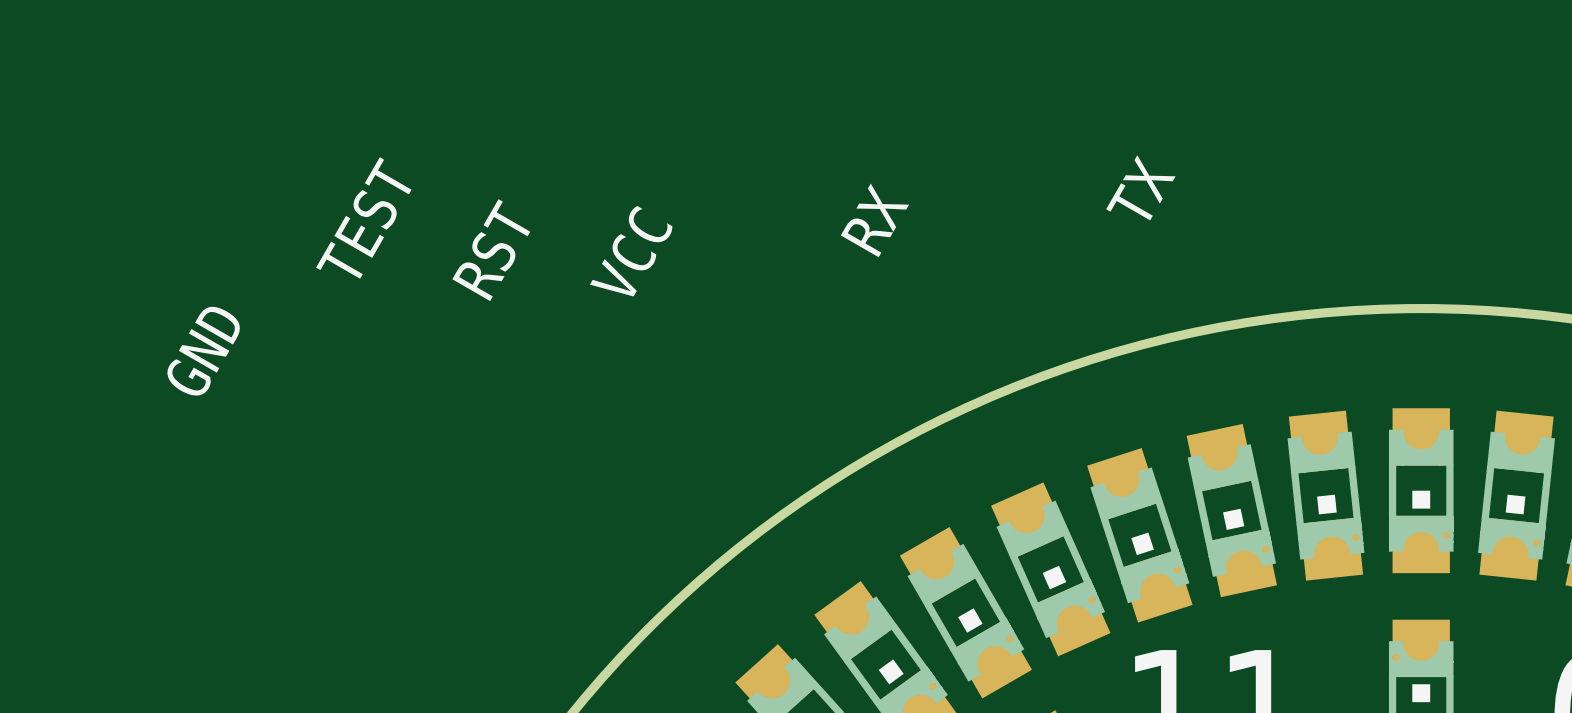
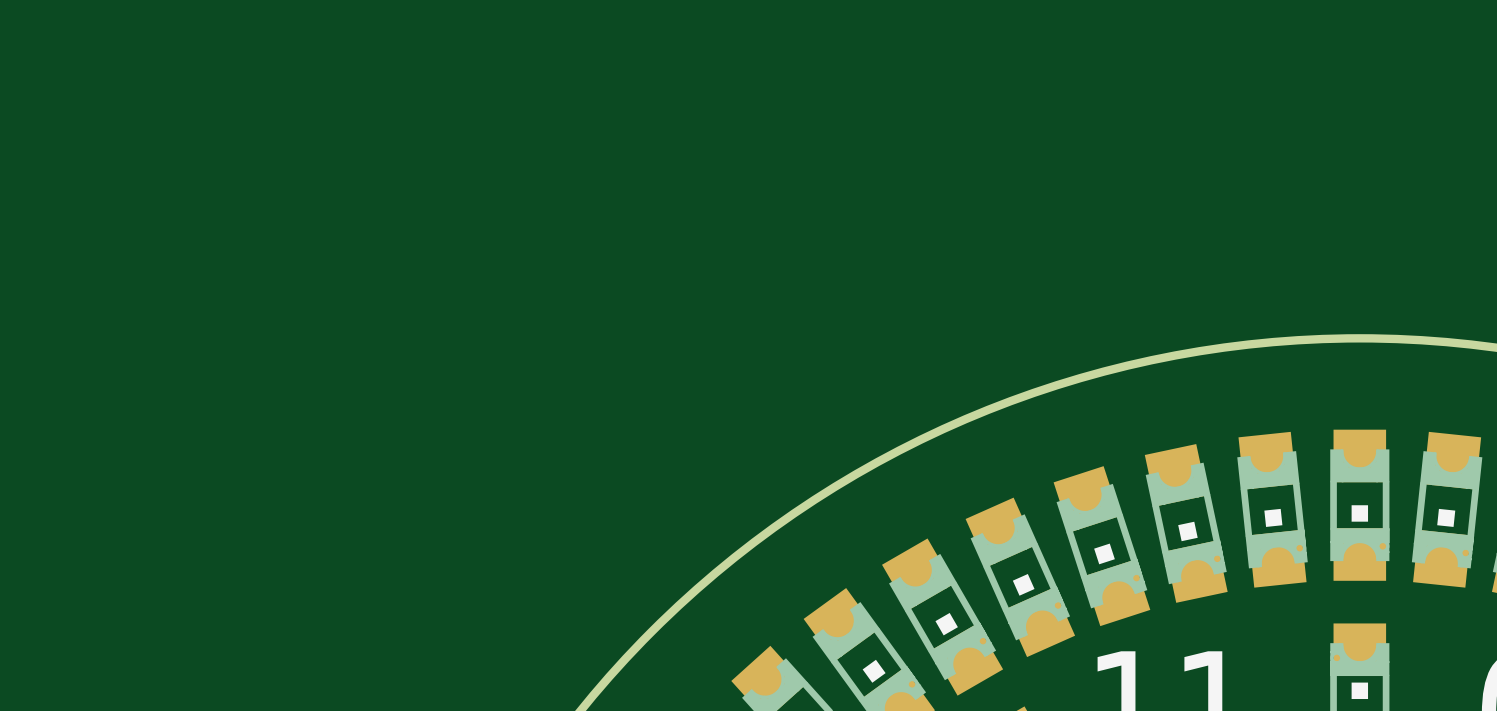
text: TX (1140, 187) -> none
text: TEST (363, 217) -> none
text: RX (874, 220) -> none
text: RST (491, 250) -> none
text: VCC (631, 251) -> none
text: GND (203, 351) -> none

